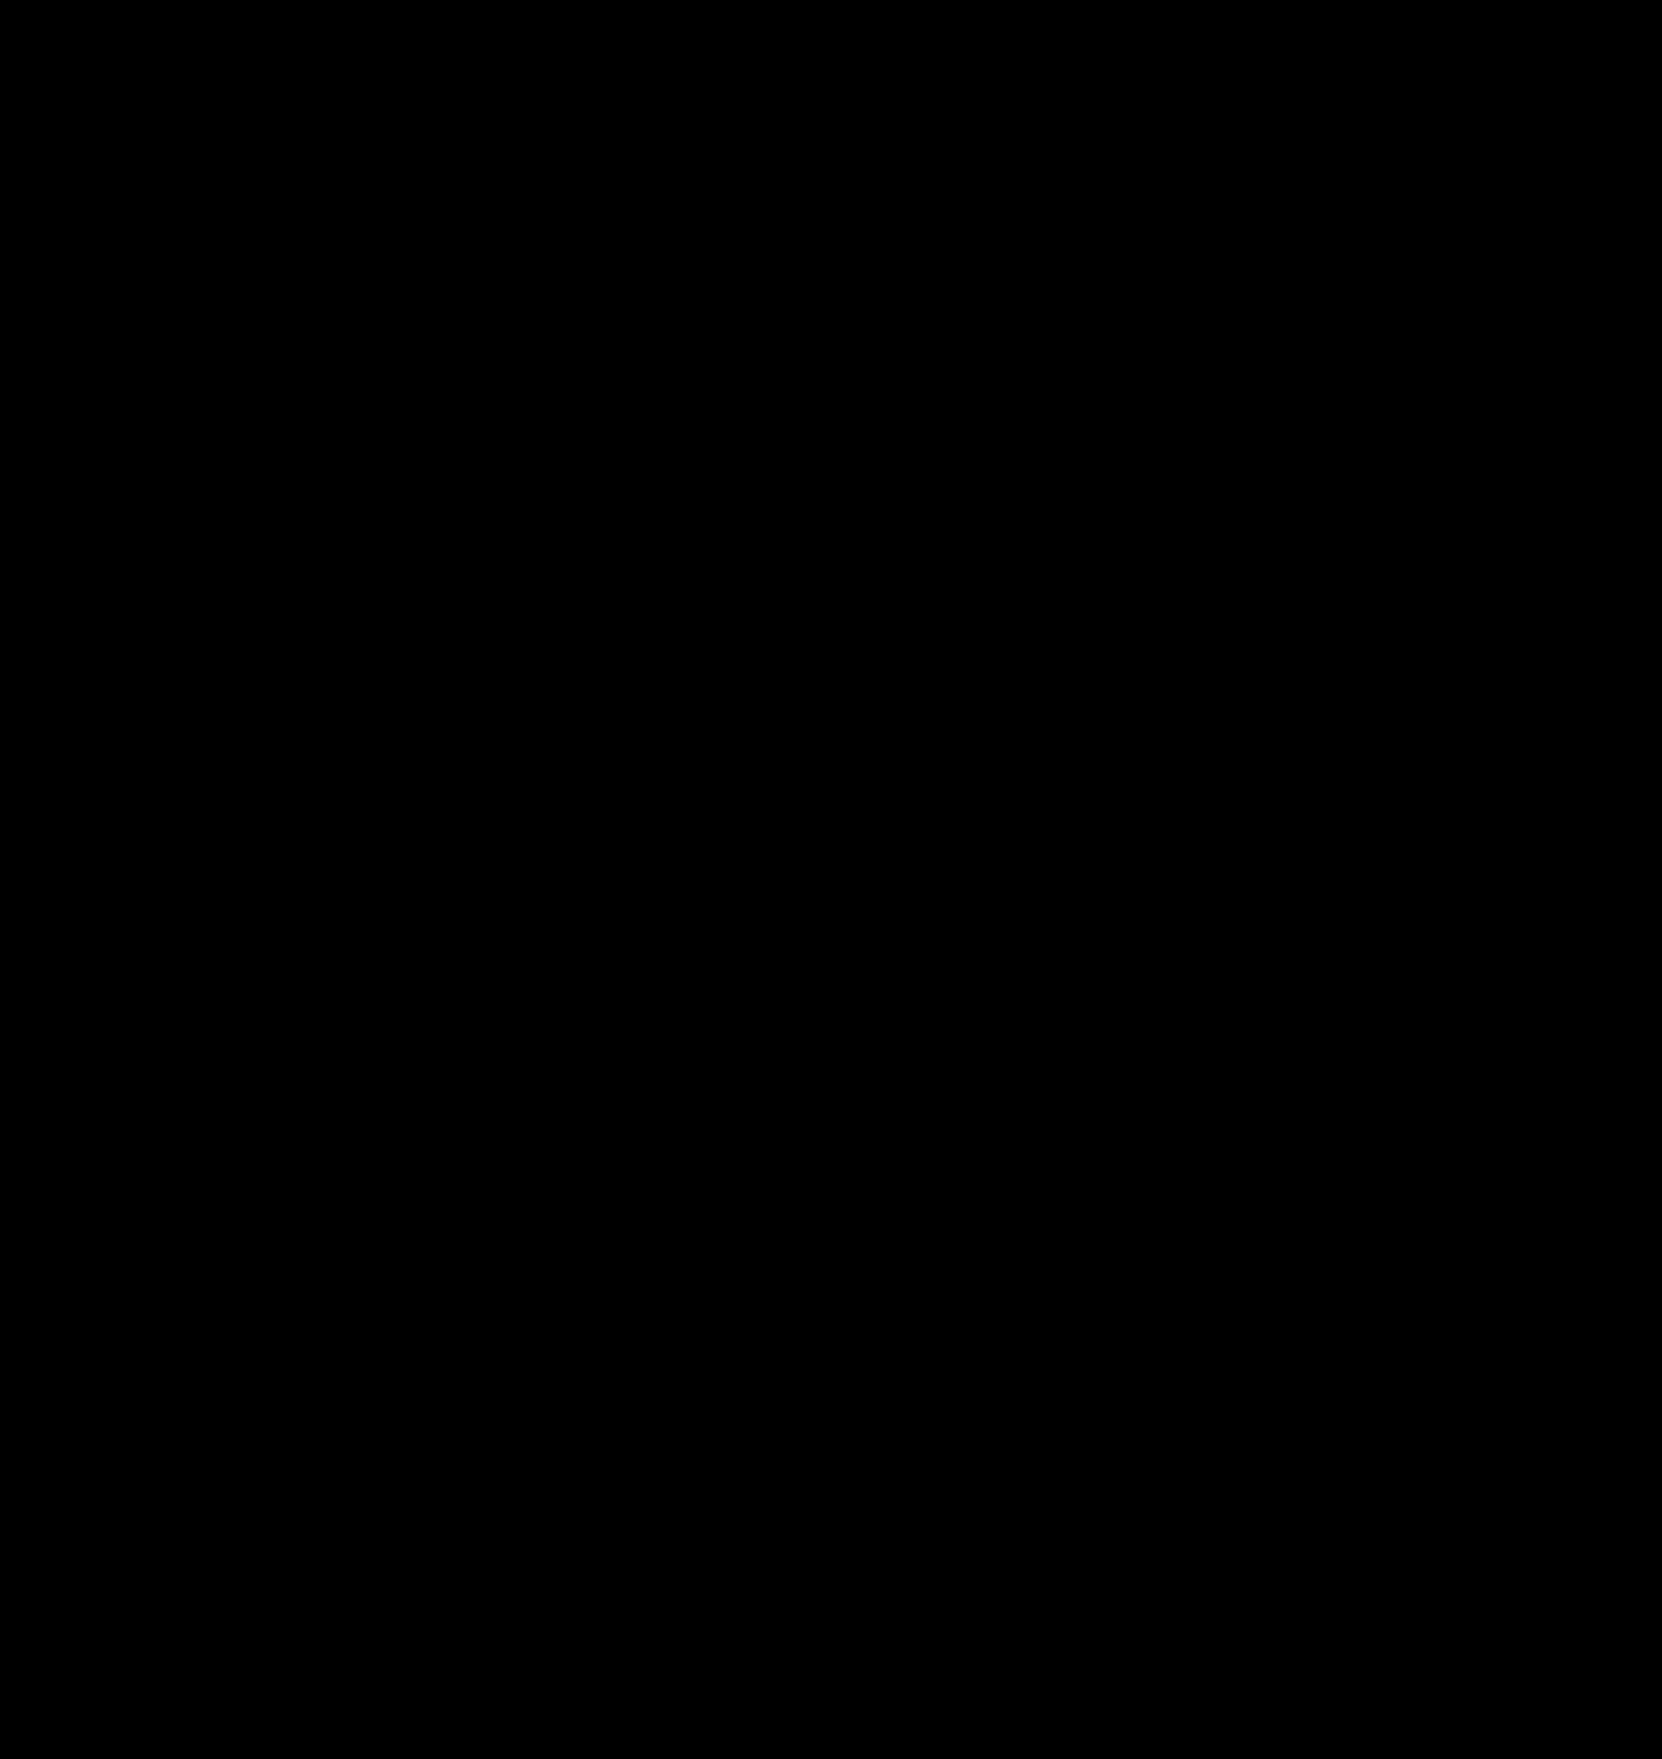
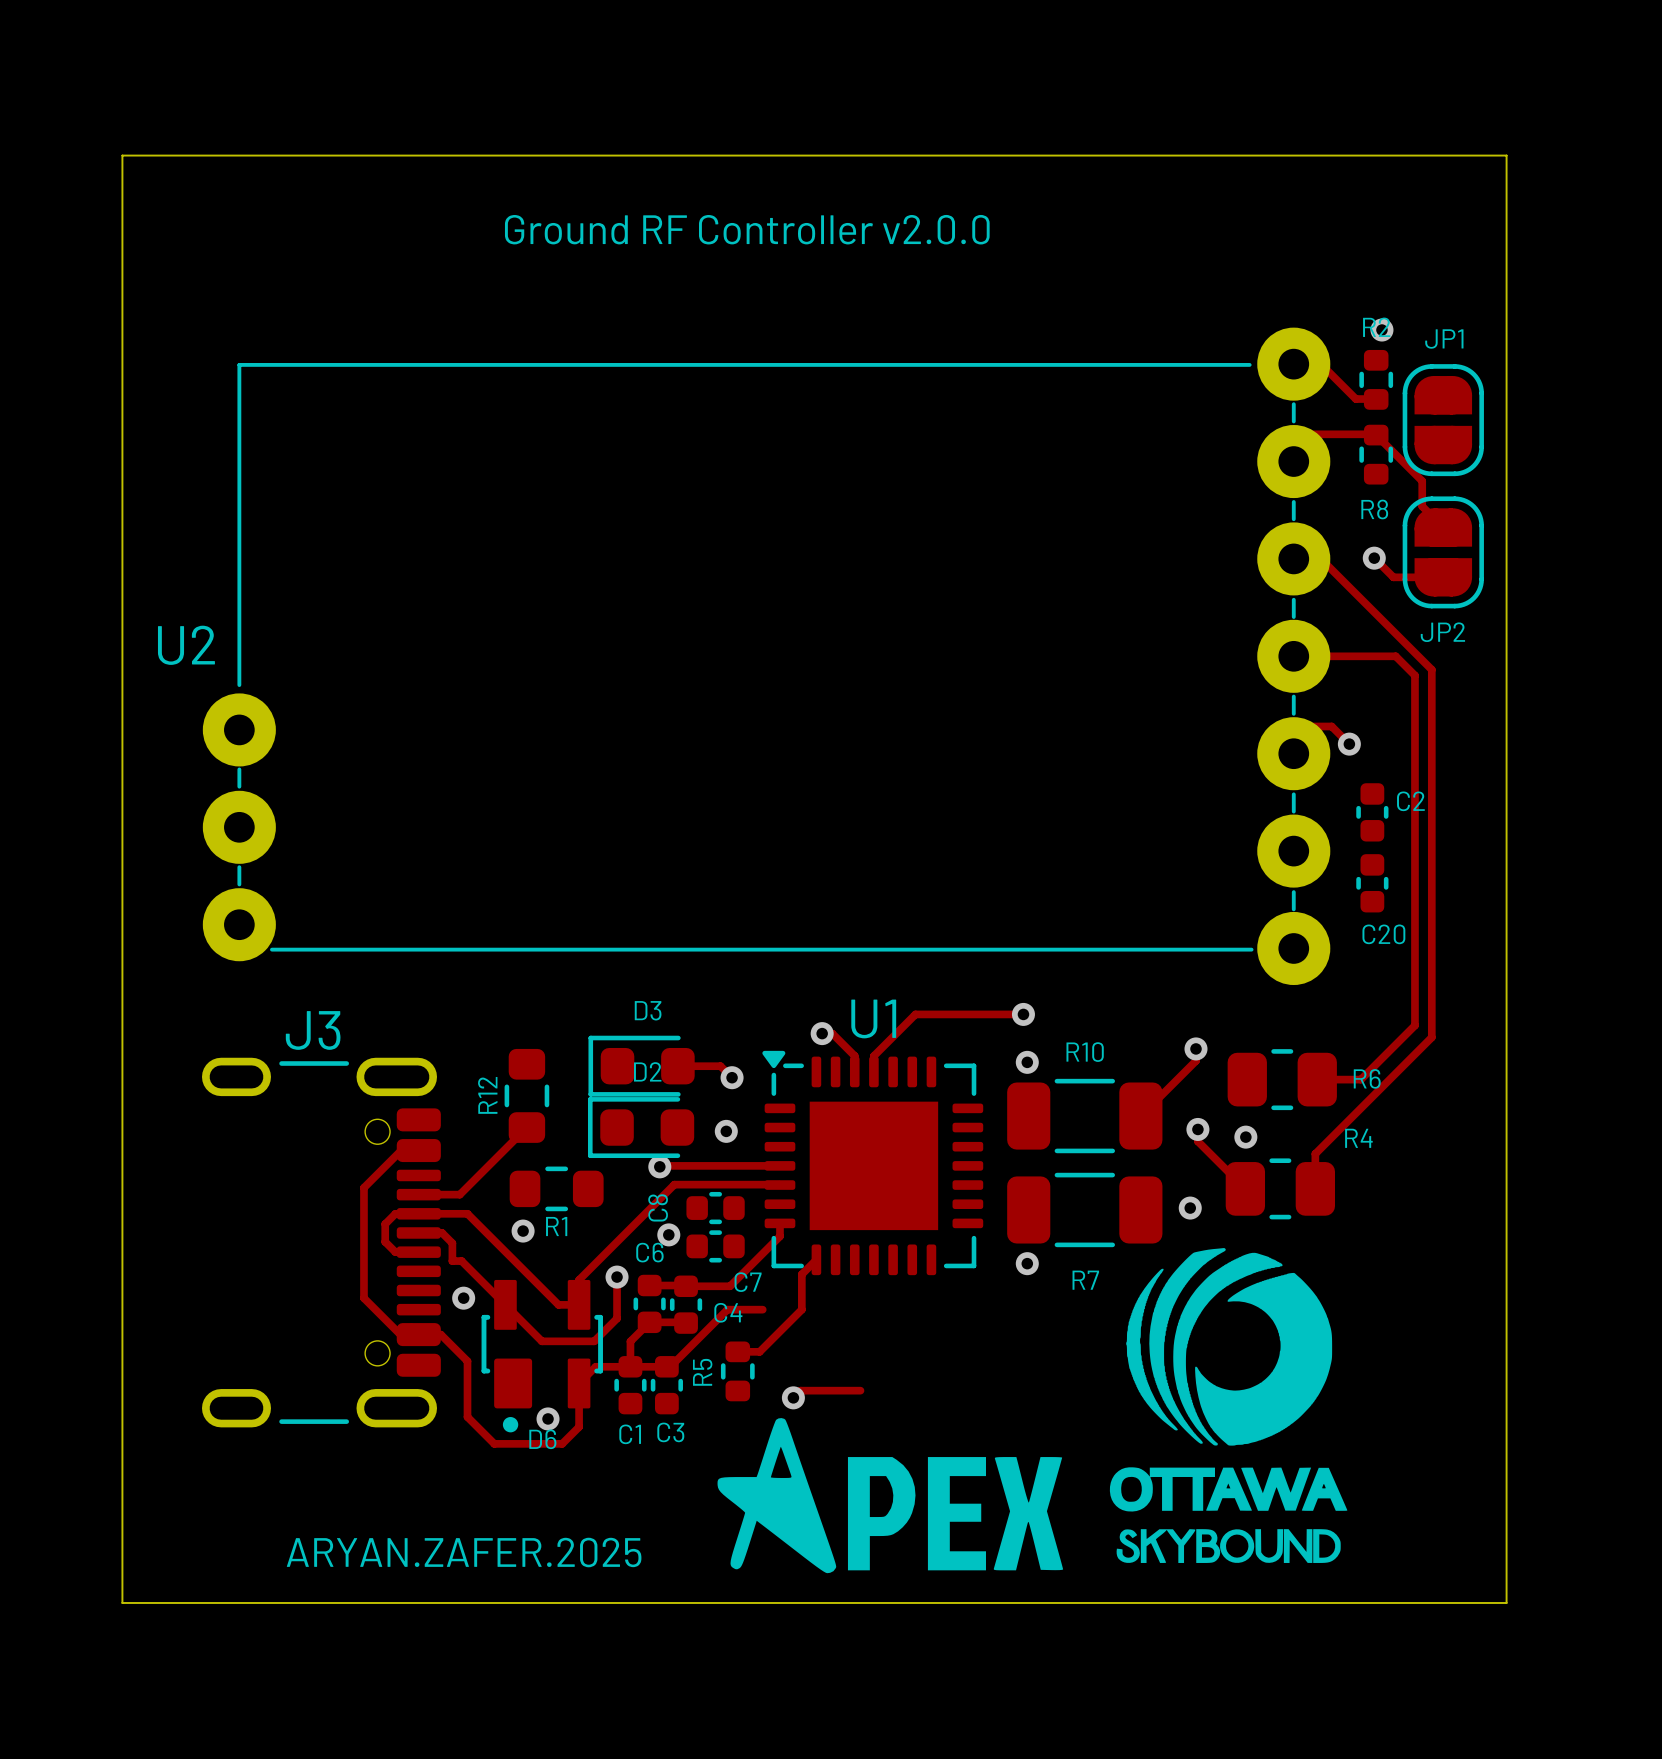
board edge: none -> (122, 155) (1506, 155) (1506, 1602) (122, 1602) (122, 155)
text: none -> Ground RF Controller v2.0.0 (747, 229)
via: none -> (1381, 330)
track: none -> (1293, 336) (1355, 399) (1375, 399)
R2: none -> (1376, 379)
JP1: none -> (1443, 420)
track: none -> (1293, 434) (1375, 434) (1422, 481) (1422, 506) (1443, 527)
R8: none -> (1376, 454)
JP2: none -> (1443, 552)
track: none -> (1293, 558) (1321, 558) (1431, 669) (1431, 1037) (1315, 1153) (1315, 1188)
track: none -> (1374, 558) (1393, 577) (1443, 577)
via: none -> (1374, 558)
U2: none -> (766, 656)
track: none -> (1293, 656) (1395, 656) (1414, 675) (1414, 1025) (1360, 1079) (1317, 1079)
track: none -> (1293, 726) (1331, 726) (1349, 744)
via: none -> (1349, 744)
C2: none -> (1372, 812)
C20: none -> (1372, 883)
track: none -> (1023, 1014) (915, 1014) (873, 1056) (873, 1071)
via: none -> (1023, 1014)
track: none -> (822, 1033) (832, 1033) (854, 1056) (854, 1071)
via: none -> (822, 1033)
track: none -> (1196, 1048) (1196, 1060) (1140, 1116)
via: none -> (1196, 1048)
via: none -> (1027, 1062)
D3: none -> (641, 1066)
track: none -> (677, 1066) (720, 1066) (732, 1077)
via: none -> (732, 1077)
R6: none -> (1282, 1079)
R12: none -> (526, 1095)
R10: none -> (1084, 1116)
track: none -> (526, 1127) (459, 1194) (418, 1194)
D2: none -> (641, 1127)
track: none -> (1197, 1129) (1197, 1141) (1245, 1188)
via: none -> (1197, 1129)
via: none -> (726, 1131)
via: none -> (1245, 1137)
track: none -> (411, 1157) (418, 1150) (401, 1150) (363, 1187) (363, 1298) (400, 1334) (440, 1334) (467, 1361) (467, 1417) (494, 1443) (562, 1443) (579, 1426) (579, 1383) (595, 1366) (670, 1366) (727, 1309) (762, 1309)
U1: none -> (872, 1163)
track: none -> (779, 1165) (659, 1166)
via: none -> (659, 1166)
track: none -> (779, 1184) (674, 1184) (579, 1279) (579, 1304) (558, 1304) (467, 1213) (395, 1213) (385, 1224) (385, 1241) (395, 1252) (418, 1252)
R1: none -> (556, 1188)
R4: none -> (1280, 1188)
C8: none -> (715, 1208)
via: none -> (1190, 1208)
R7: none -> (1084, 1209)
track: none -> (779, 1223) (779, 1236) (730, 1286) (649, 1285)
via: none -> (523, 1231)
track: none -> (418, 1232) (442, 1232) (452, 1243) (452, 1261) (461, 1261) (541, 1341) (594, 1341) (617, 1318) (617, 1277)
via: none -> (668, 1234)
J3: none -> (321, 1242)
C7: none -> (715, 1246)
drawing: none -> [1109, 1248, 1348, 1563]
track: none -> (816, 1259) (801, 1274) (801, 1309) (759, 1351) (737, 1351)
via: none -> (1027, 1263)
via: none -> (617, 1277)
via: none -> (463, 1298)
C6: none -> (649, 1303)
C4: none -> (686, 1304)
track: none -> (686, 1323) (649, 1322) (630, 1341) (630, 1366)
D6: none -> (542, 1356)
R5: none -> (737, 1371)
C1: none -> (630, 1385)
C3: none -> (666, 1385)
track: none -> (860, 1390) (800, 1390) (793, 1397)
via: none -> (793, 1397)
via: none -> (548, 1418)
drawing: none -> [717, 1418, 1064, 1574]
text: none -> ARYAN.ZAFER.2025 (464, 1552)

